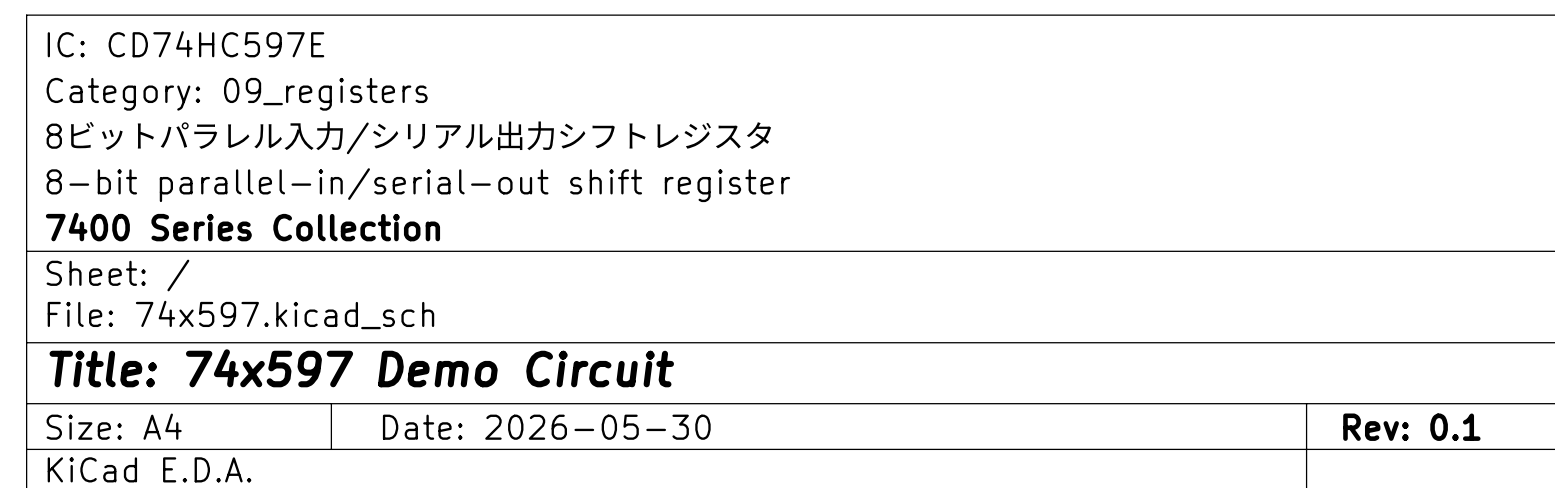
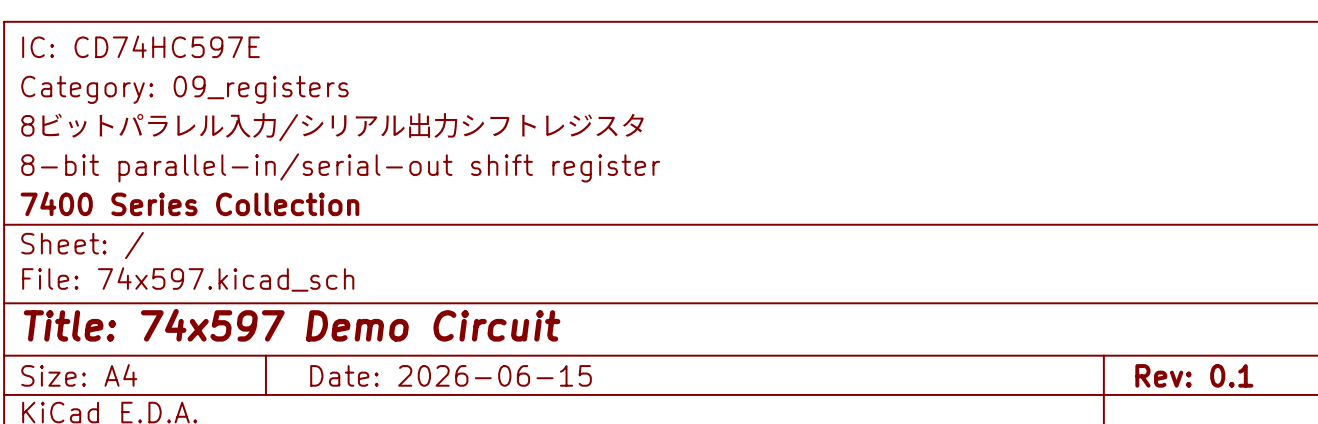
title block: Date: 2026-05-30 (546, 427) -> Date: 2026-06-15 (451, 375)

